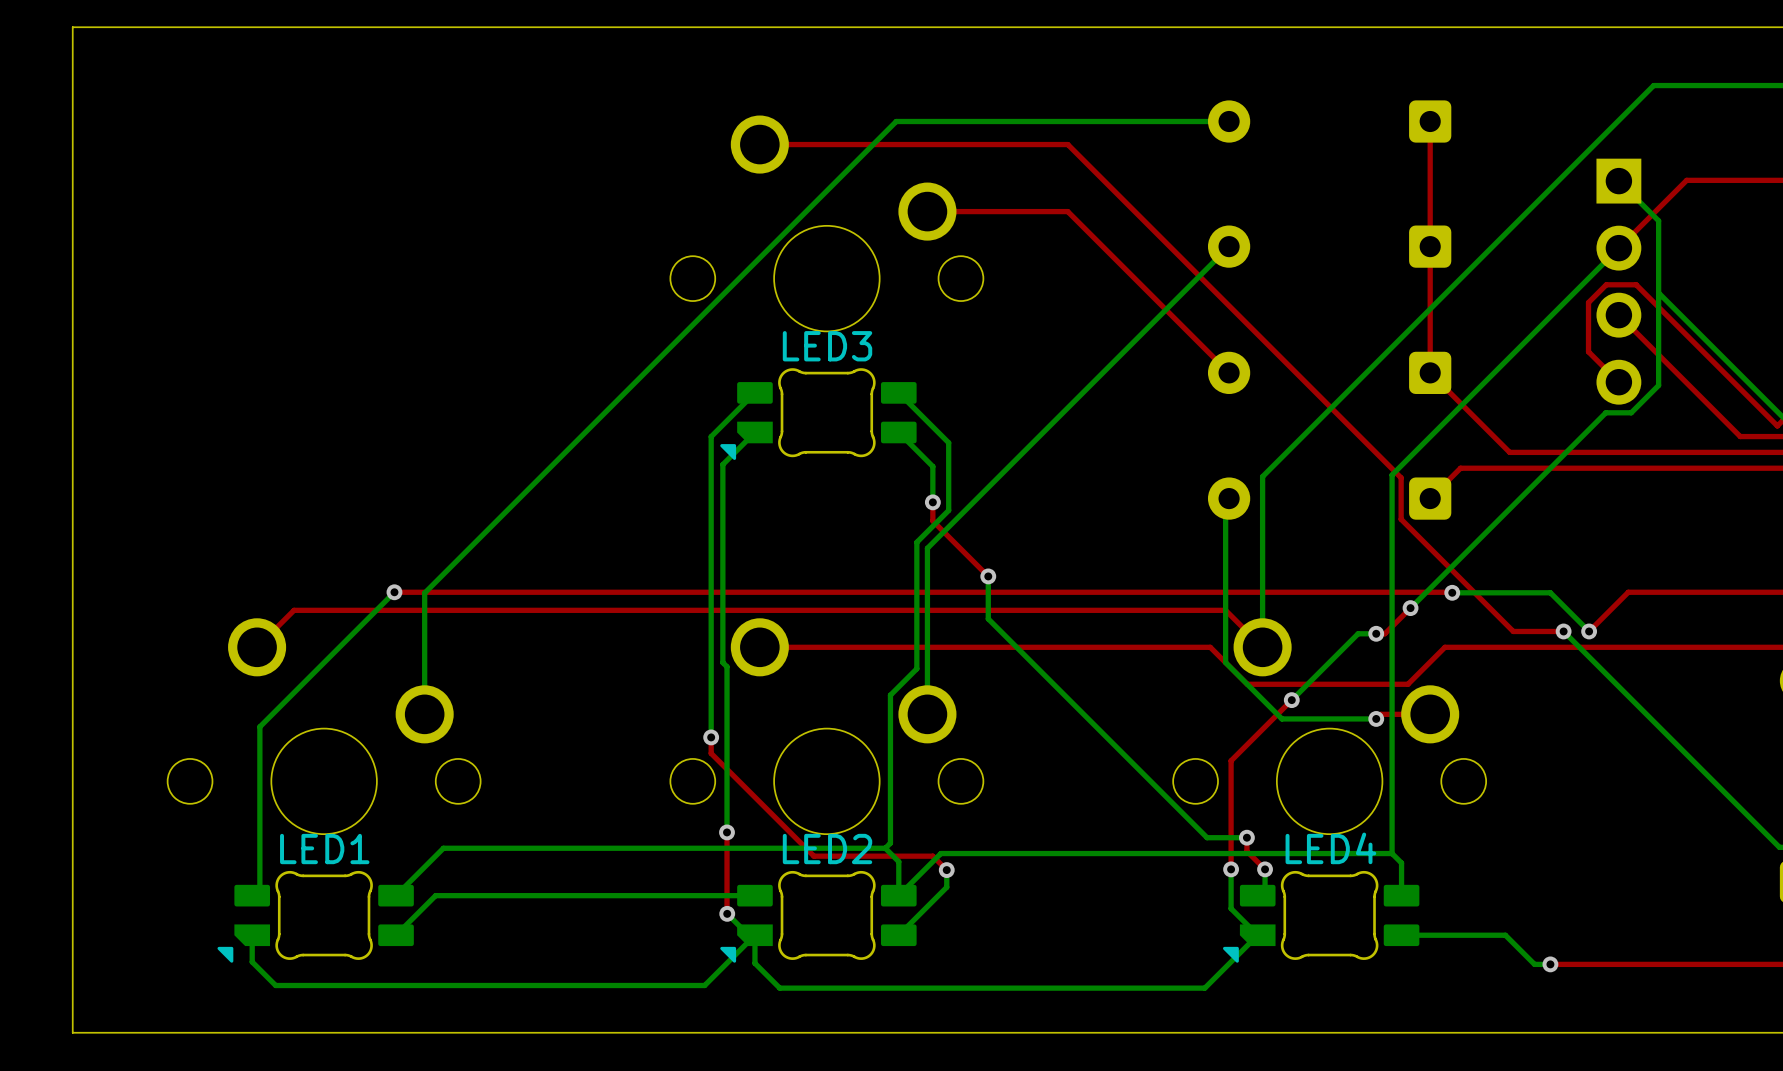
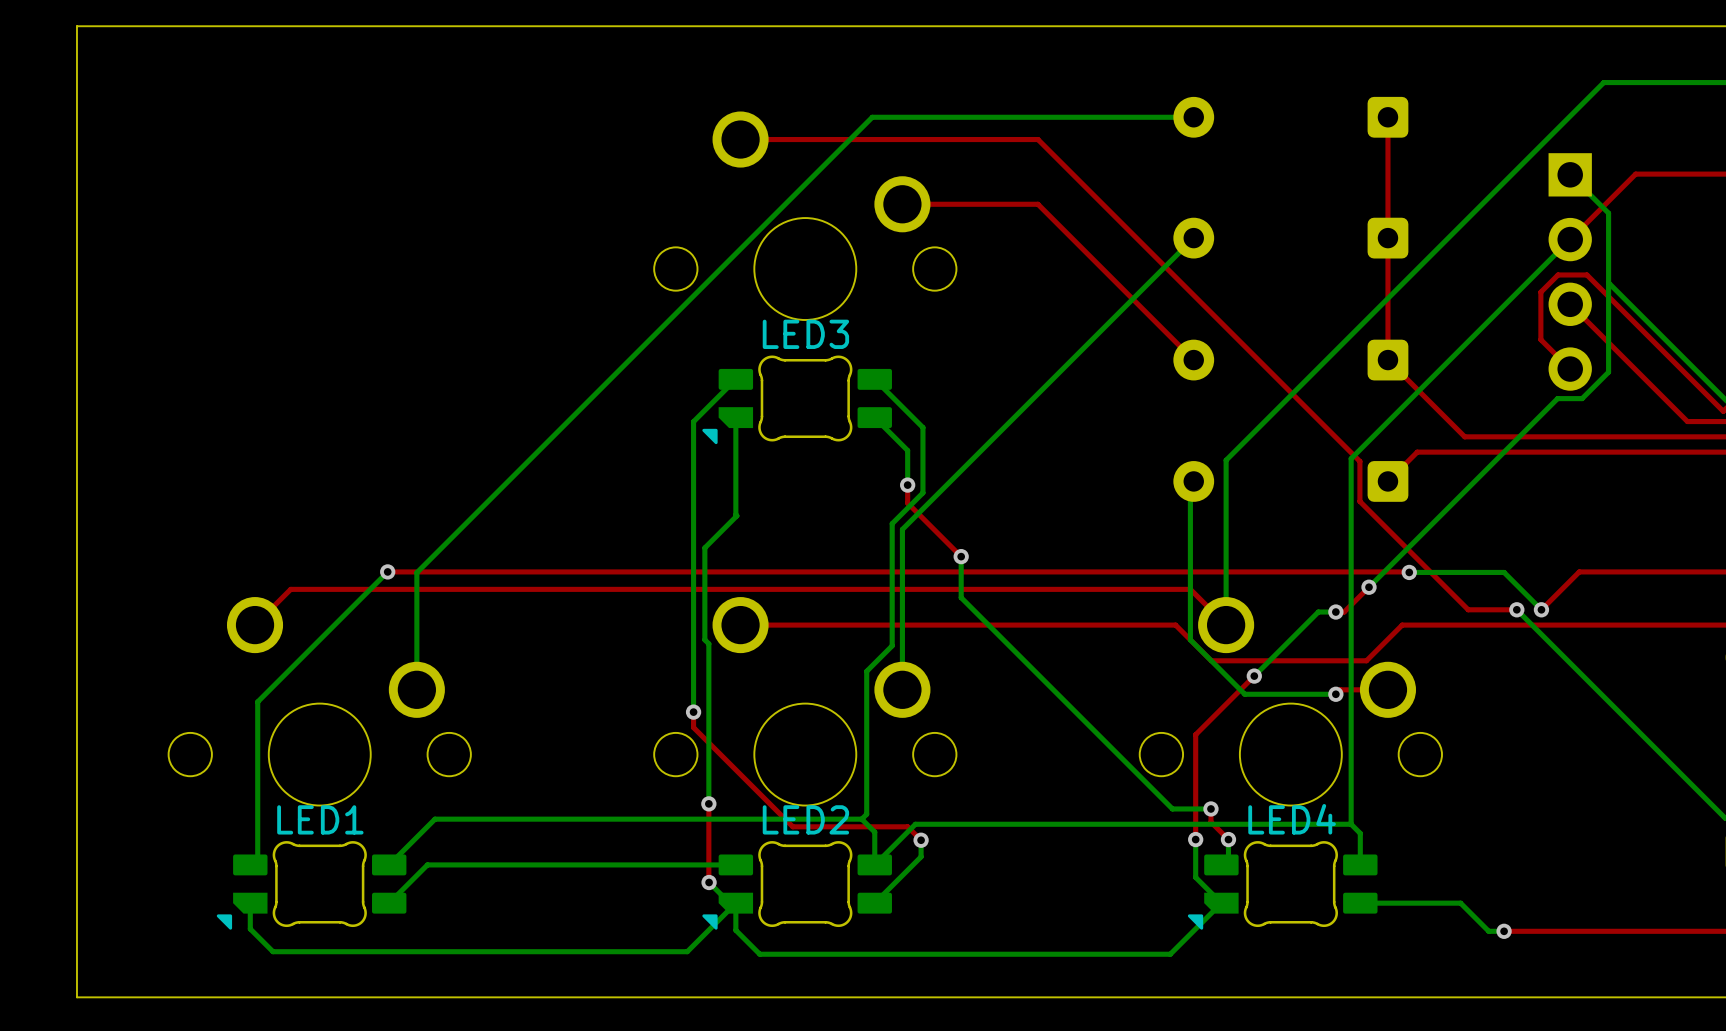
bottom track: (754, 432) (722, 464) (722, 567) -> (735, 417) (736, 515) (704, 547)

